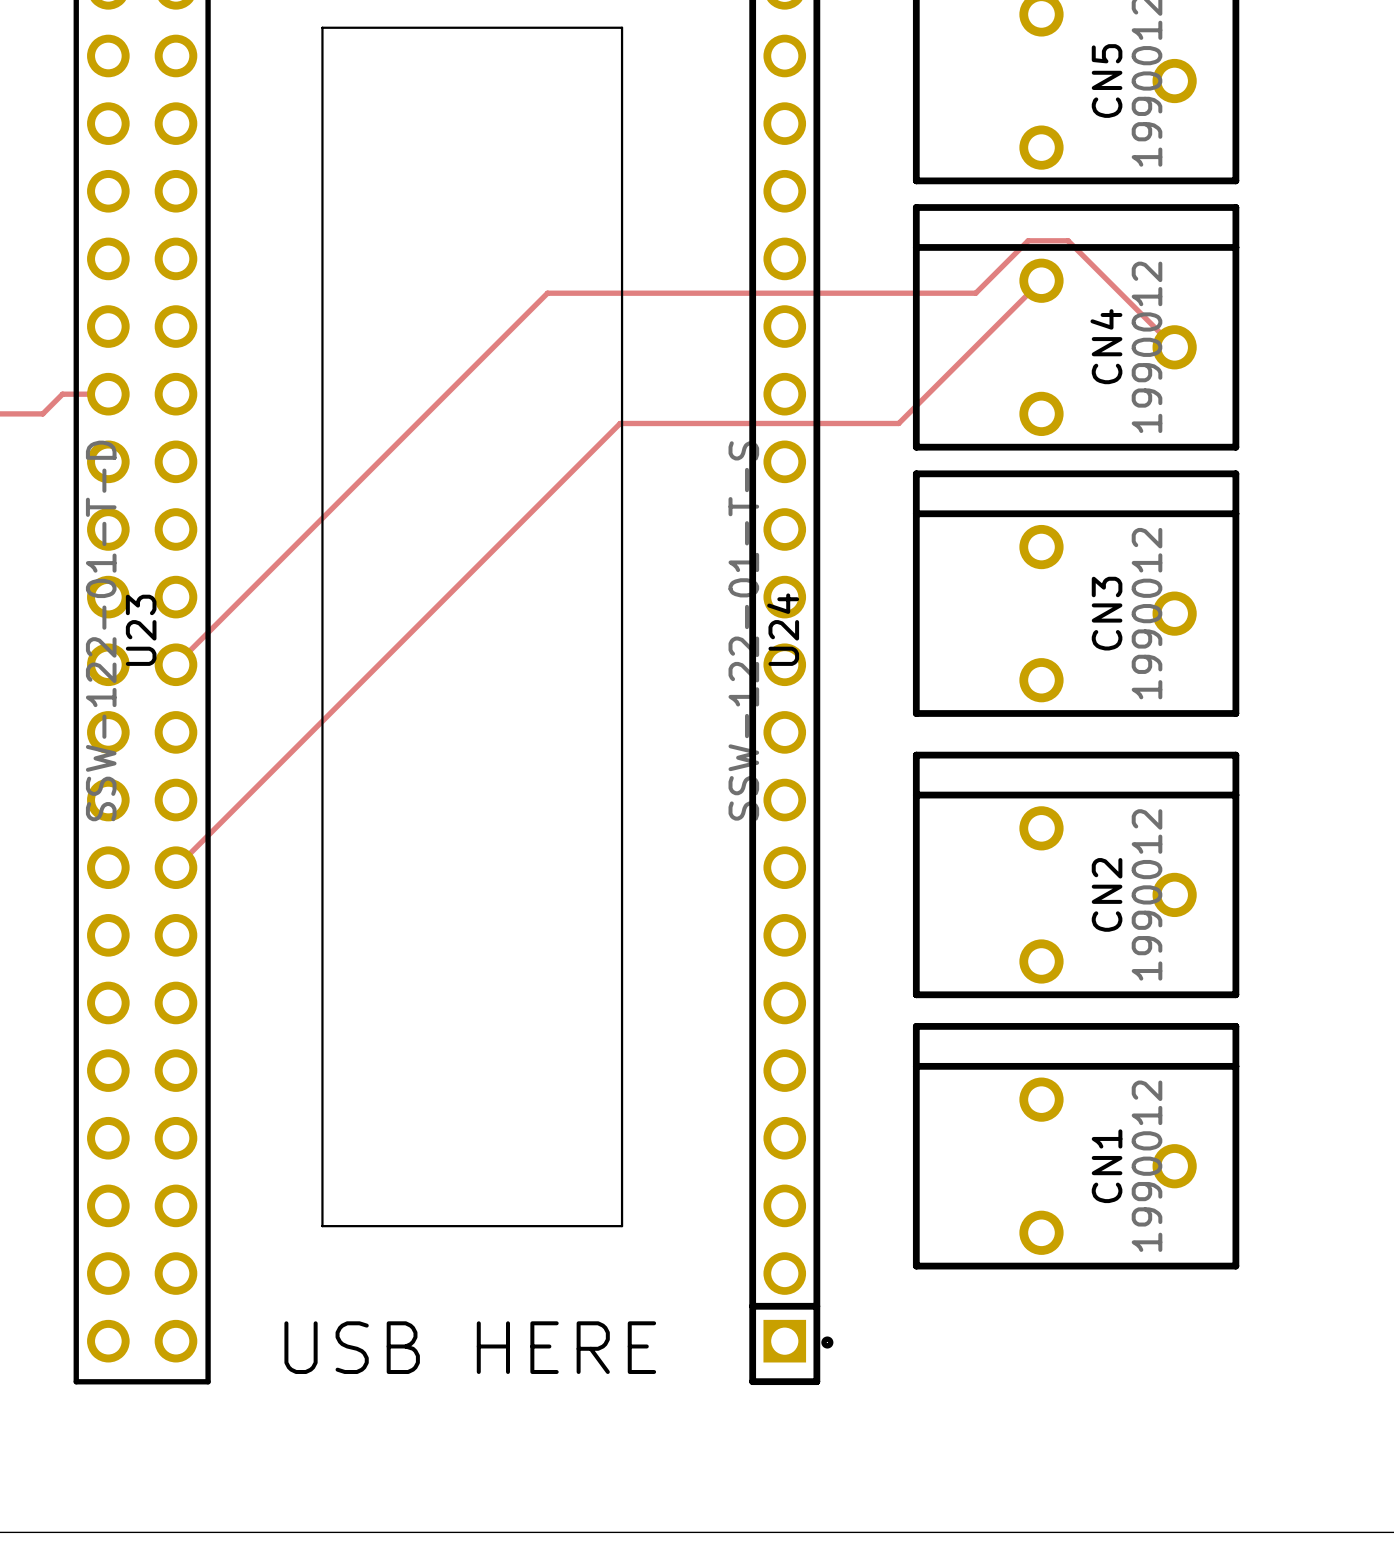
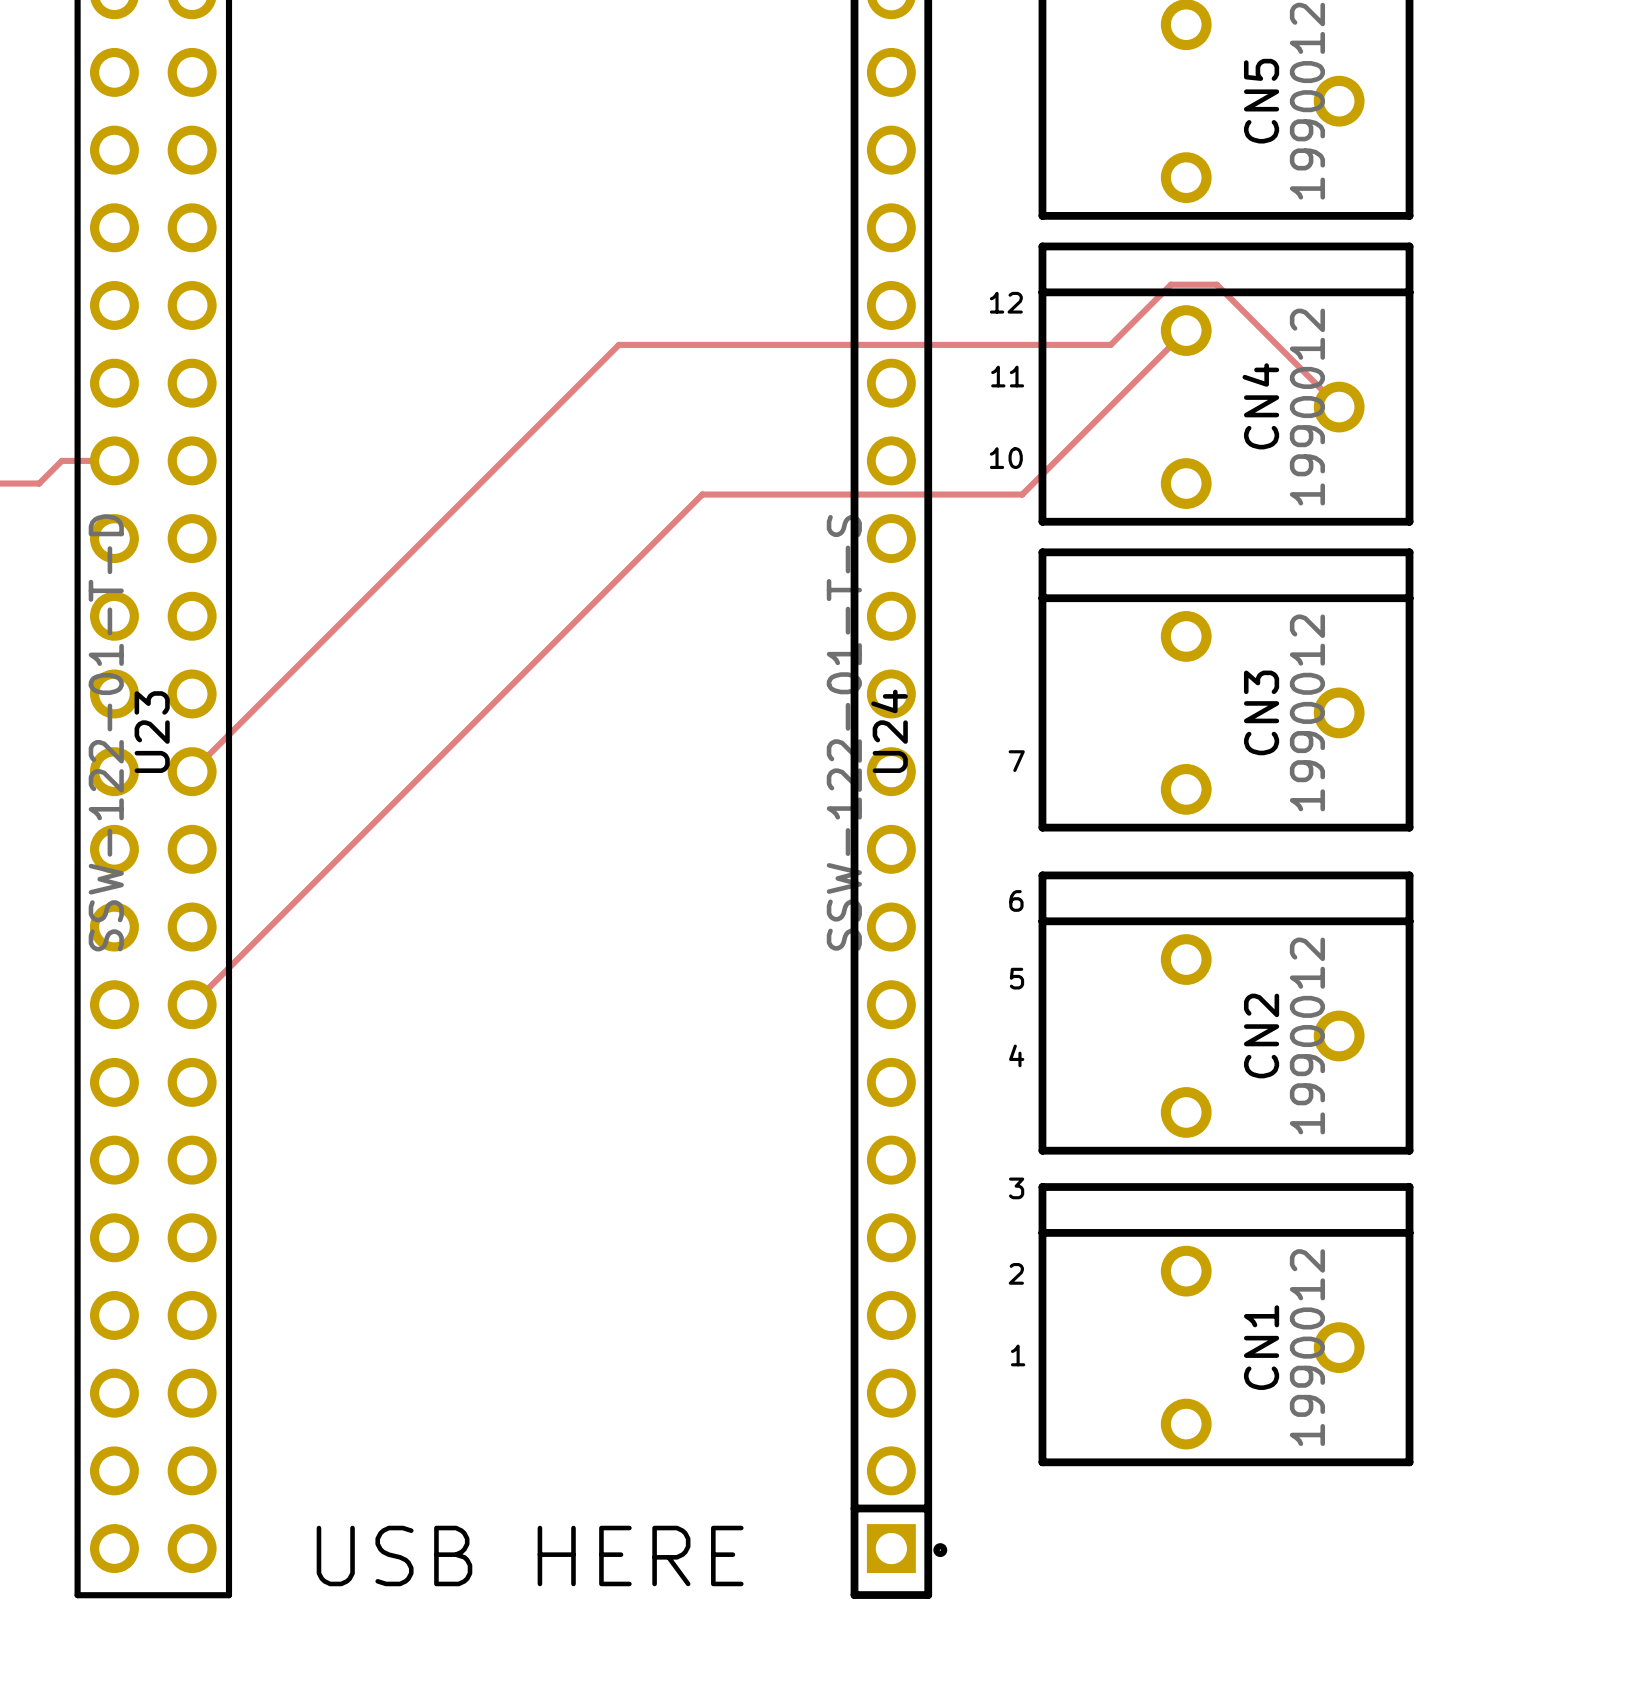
line: (322, 27) (322, 1226) (622, 1226) (622, 27) (322, 27) -> none
text: none -> 12 (1006, 302)
text: none -> 11 (1007, 376)
text: none -> 10 (1006, 458)
text: none -> 7 (1016, 761)
text: none -> 6 (1016, 900)
text: none -> 5 (1016, 978)
text: none -> 4 (1016, 1055)
text: none -> 3 (1016, 1188)
text: none -> 2 (1016, 1273)
text: none -> 1 (1018, 1355)

